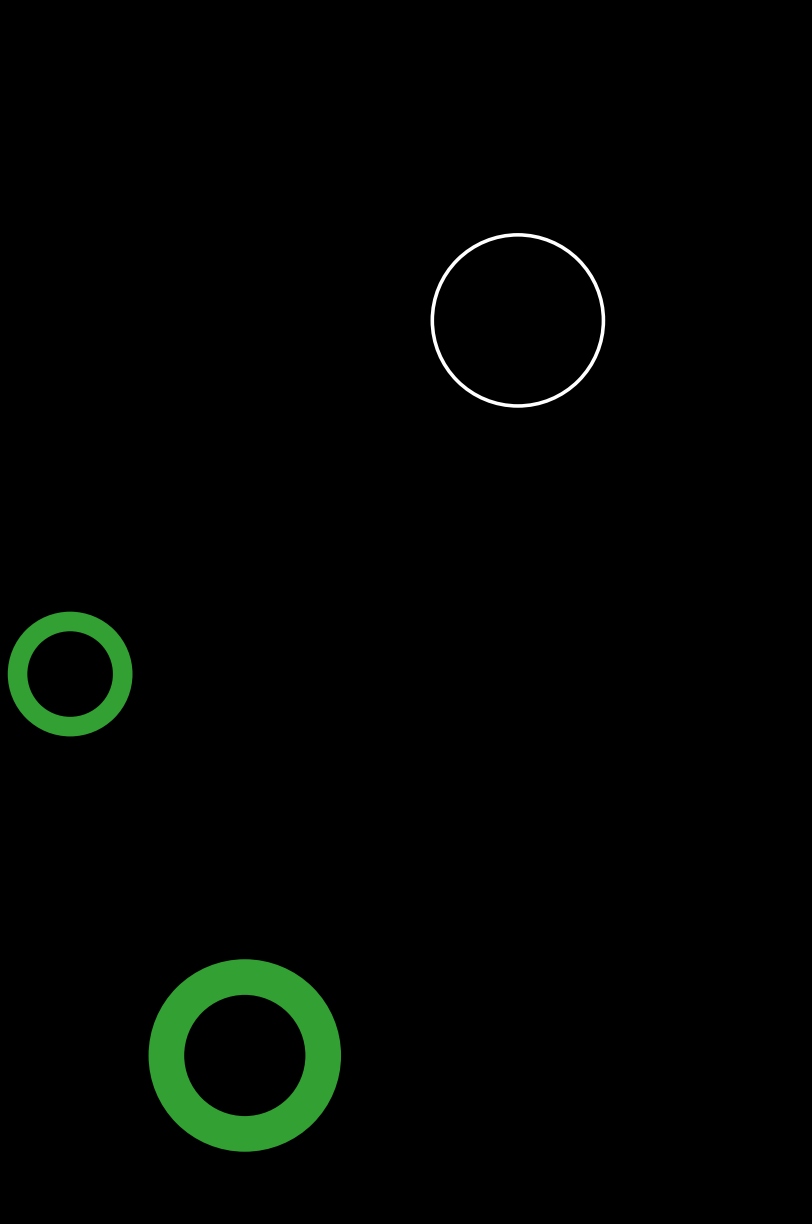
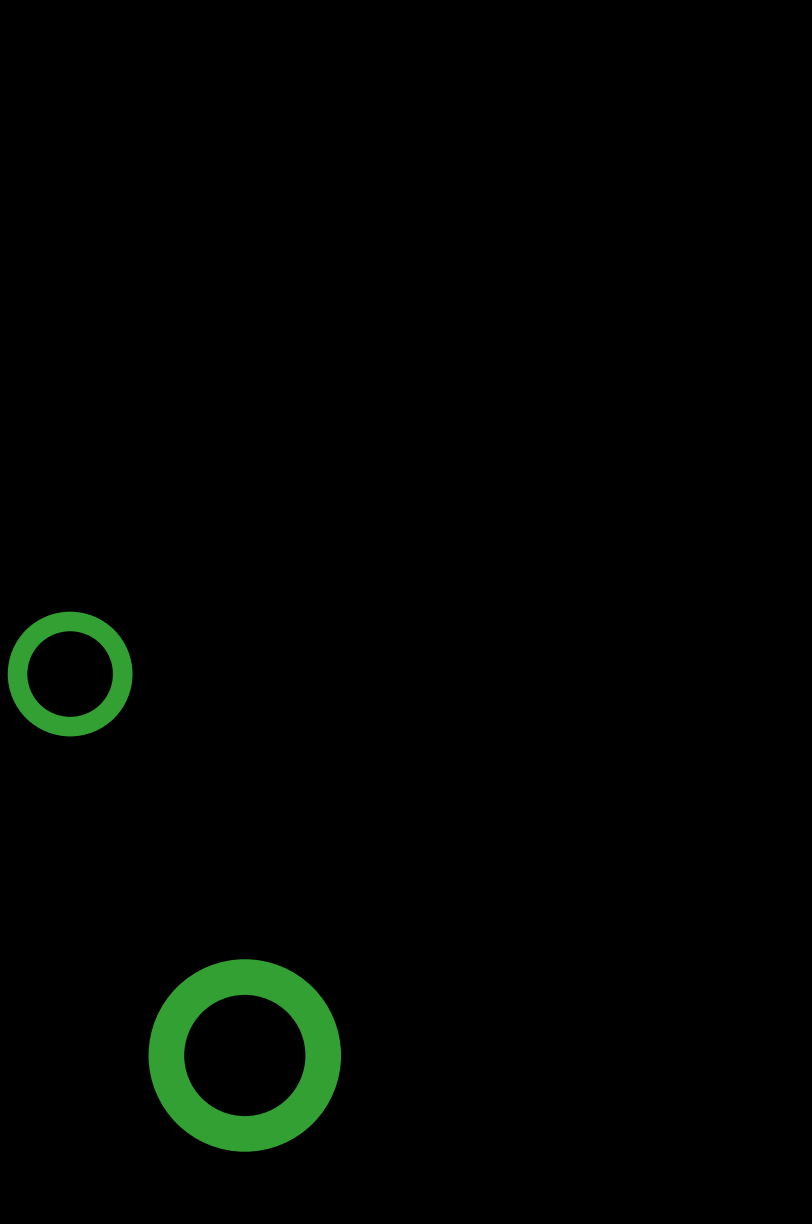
round board edge: [430, 233, 606, 408] -> none

